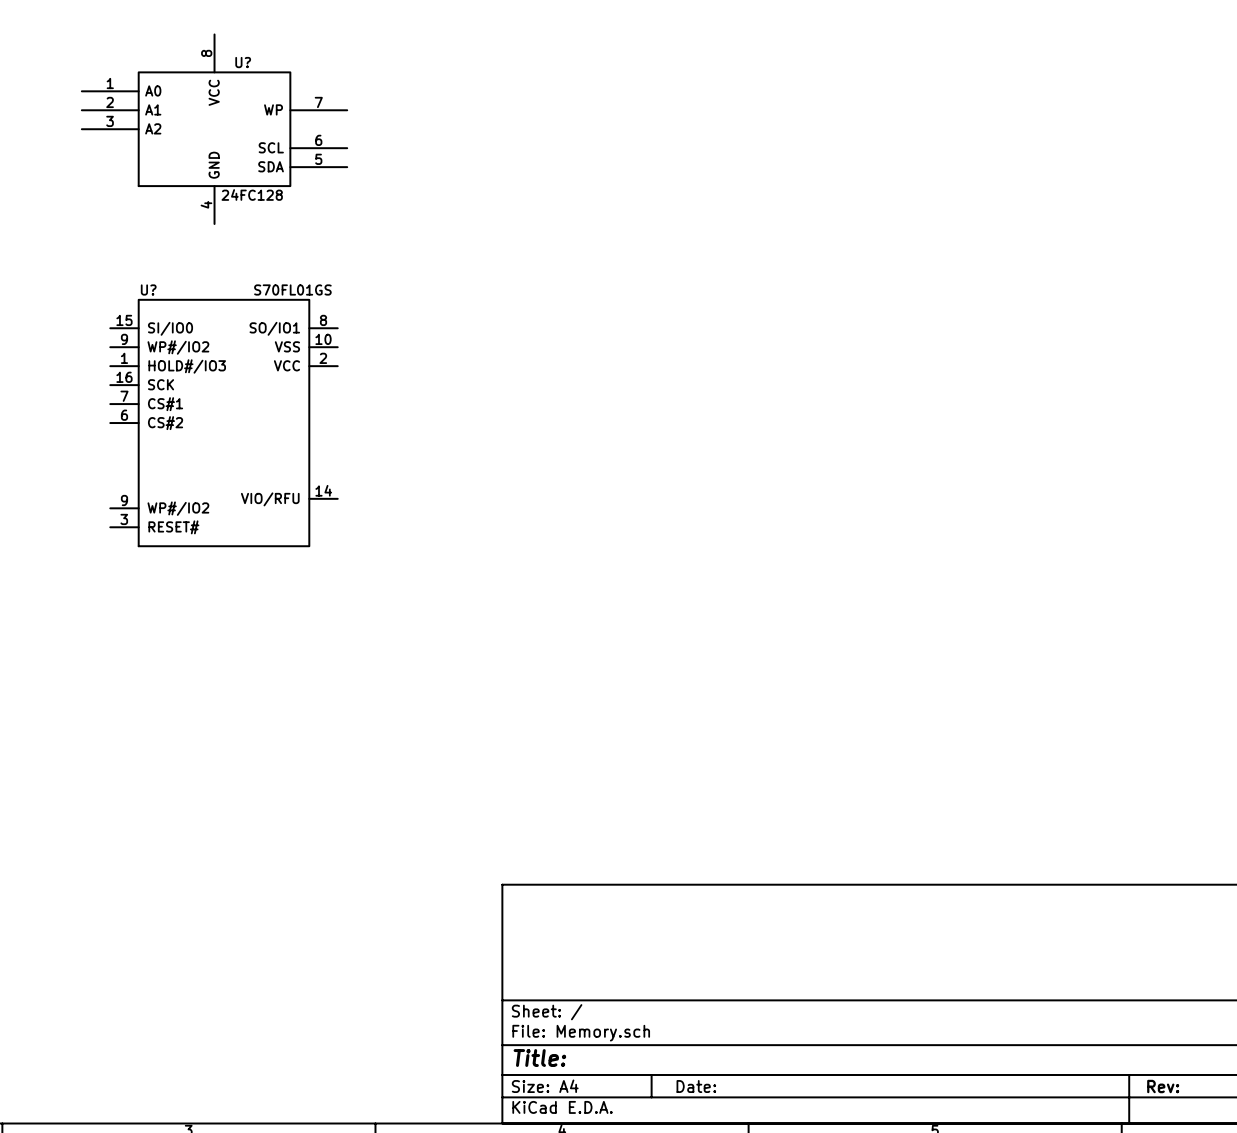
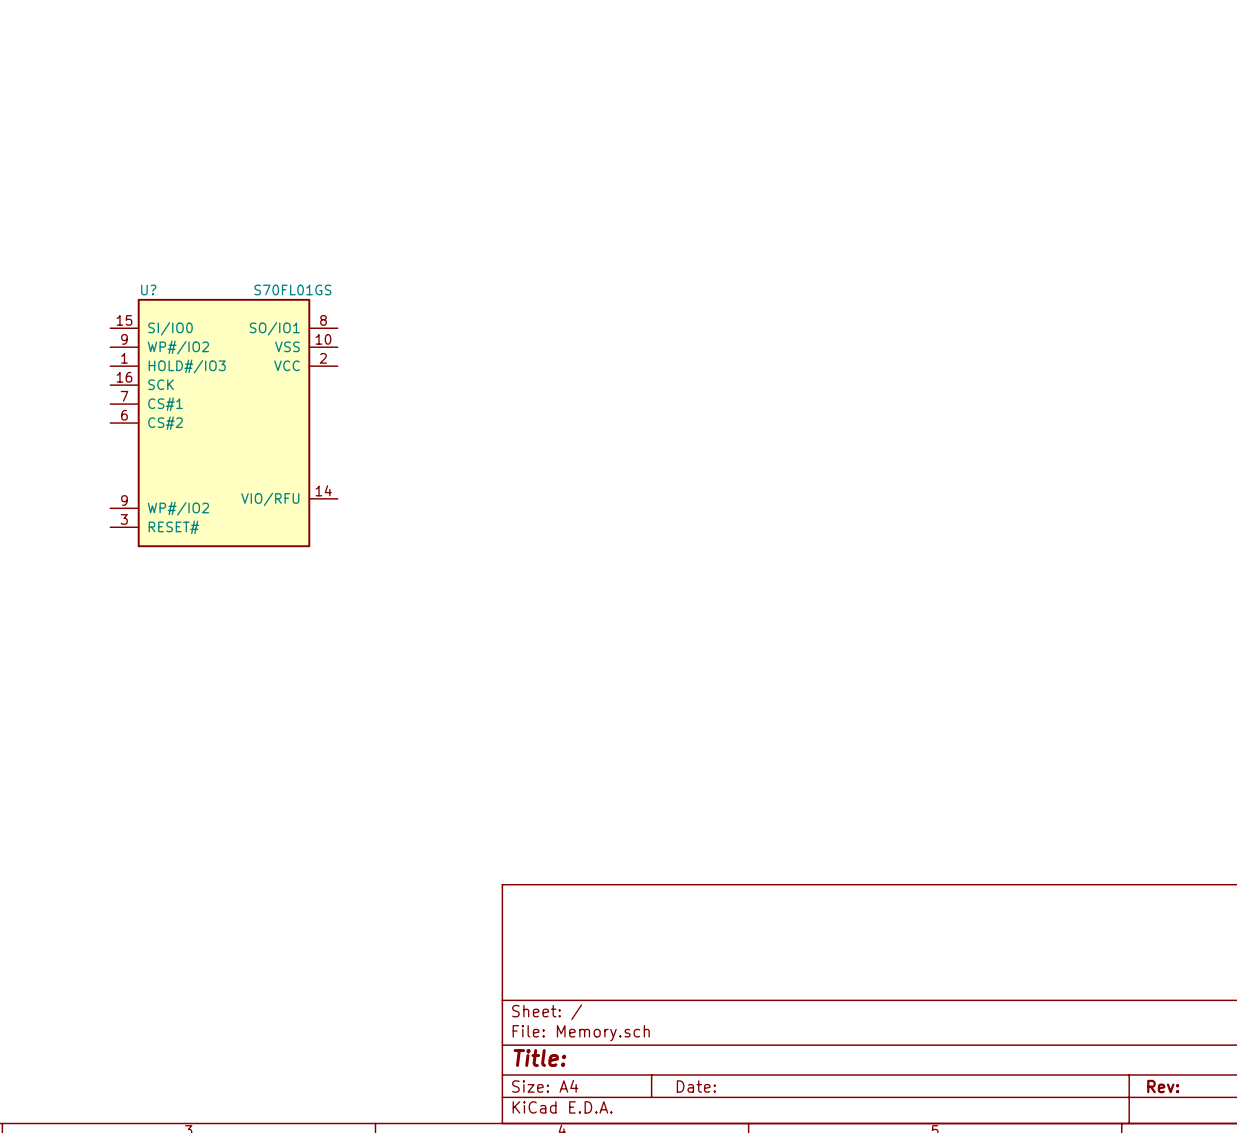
U?: 24FC128 (214, 129) -> none

